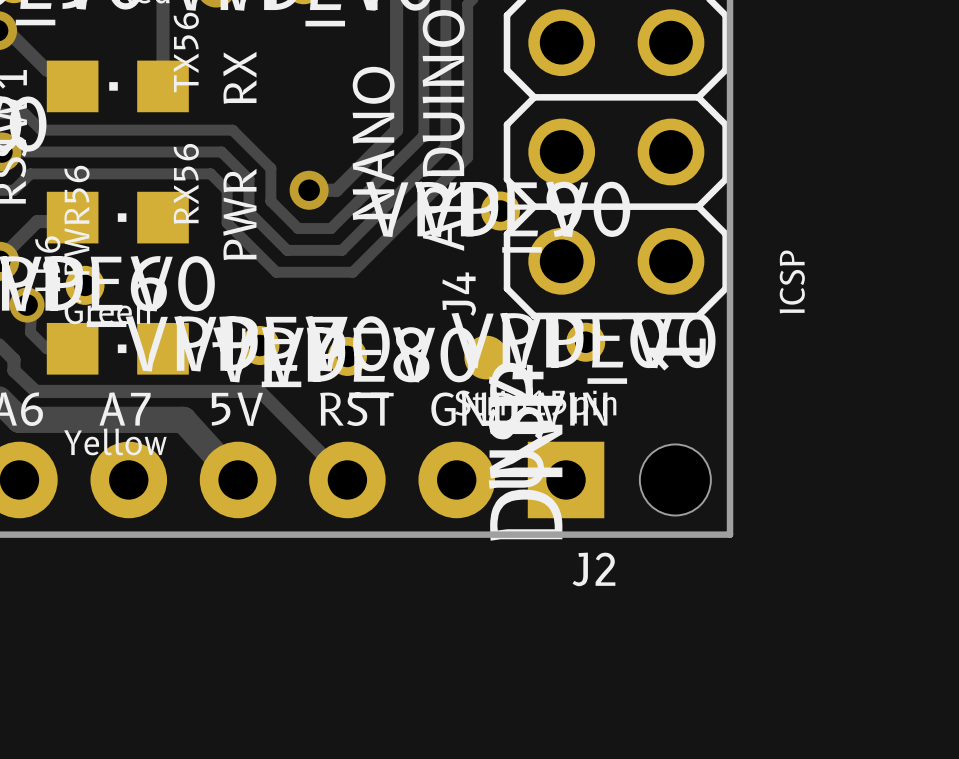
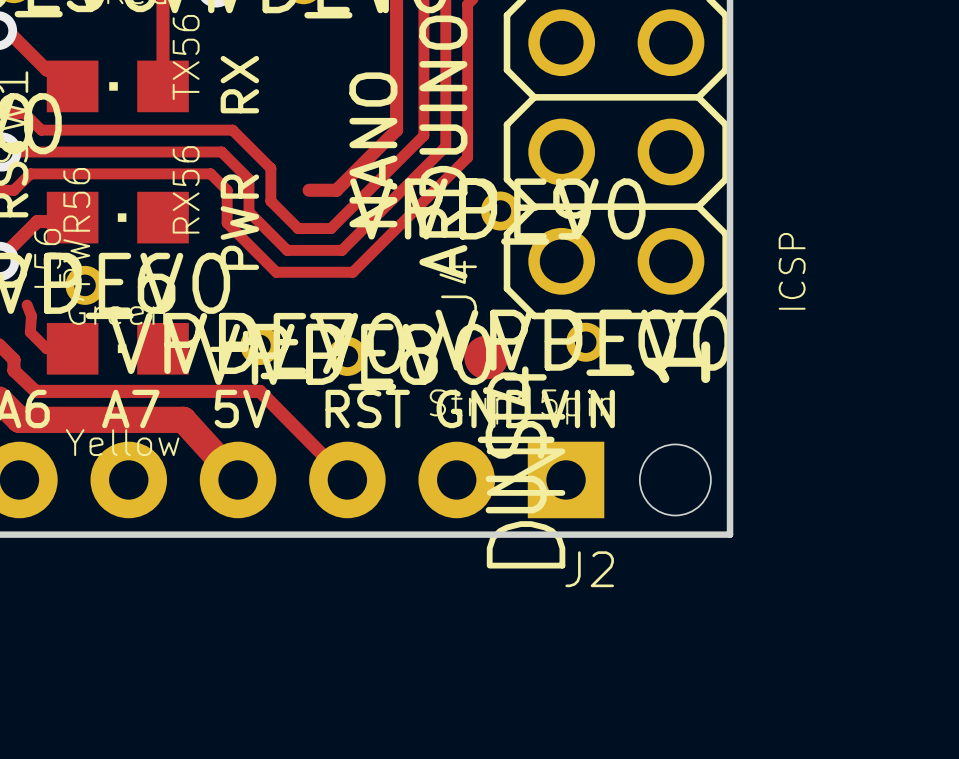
via: (309, 190) -> none
via: (27, 305) -> none

